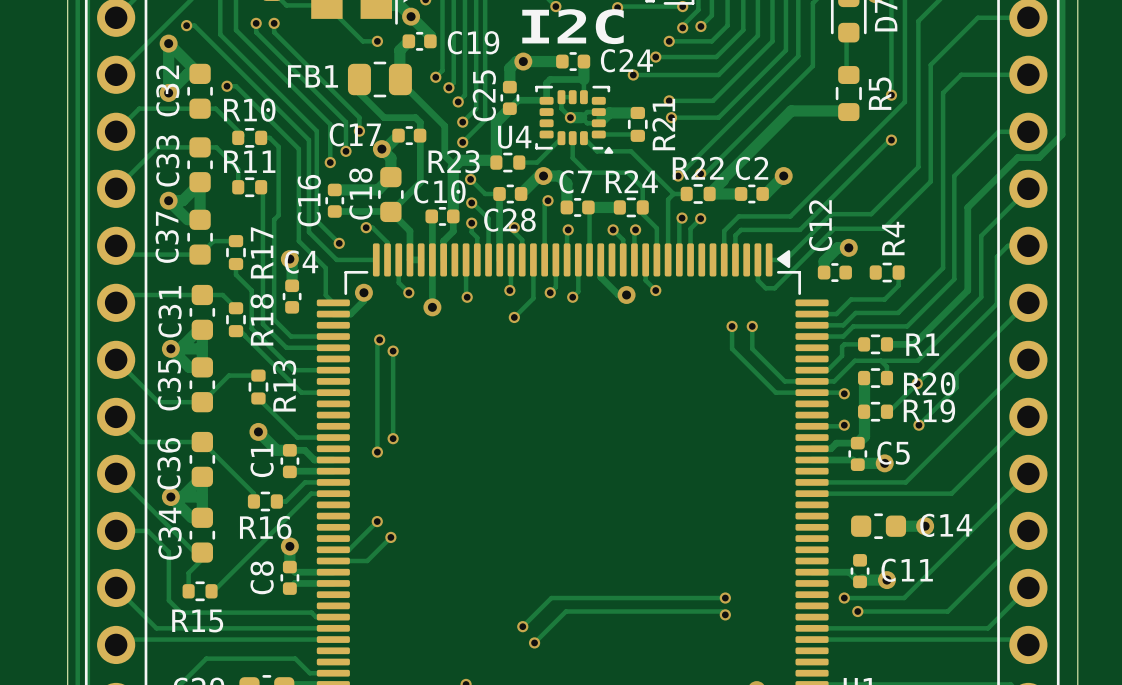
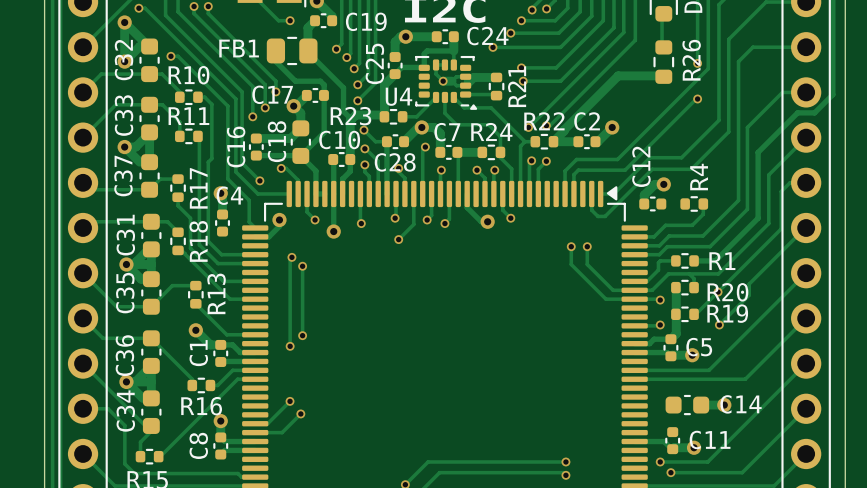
R5 name: R5 (880, 93) -> R26 (691, 60)

